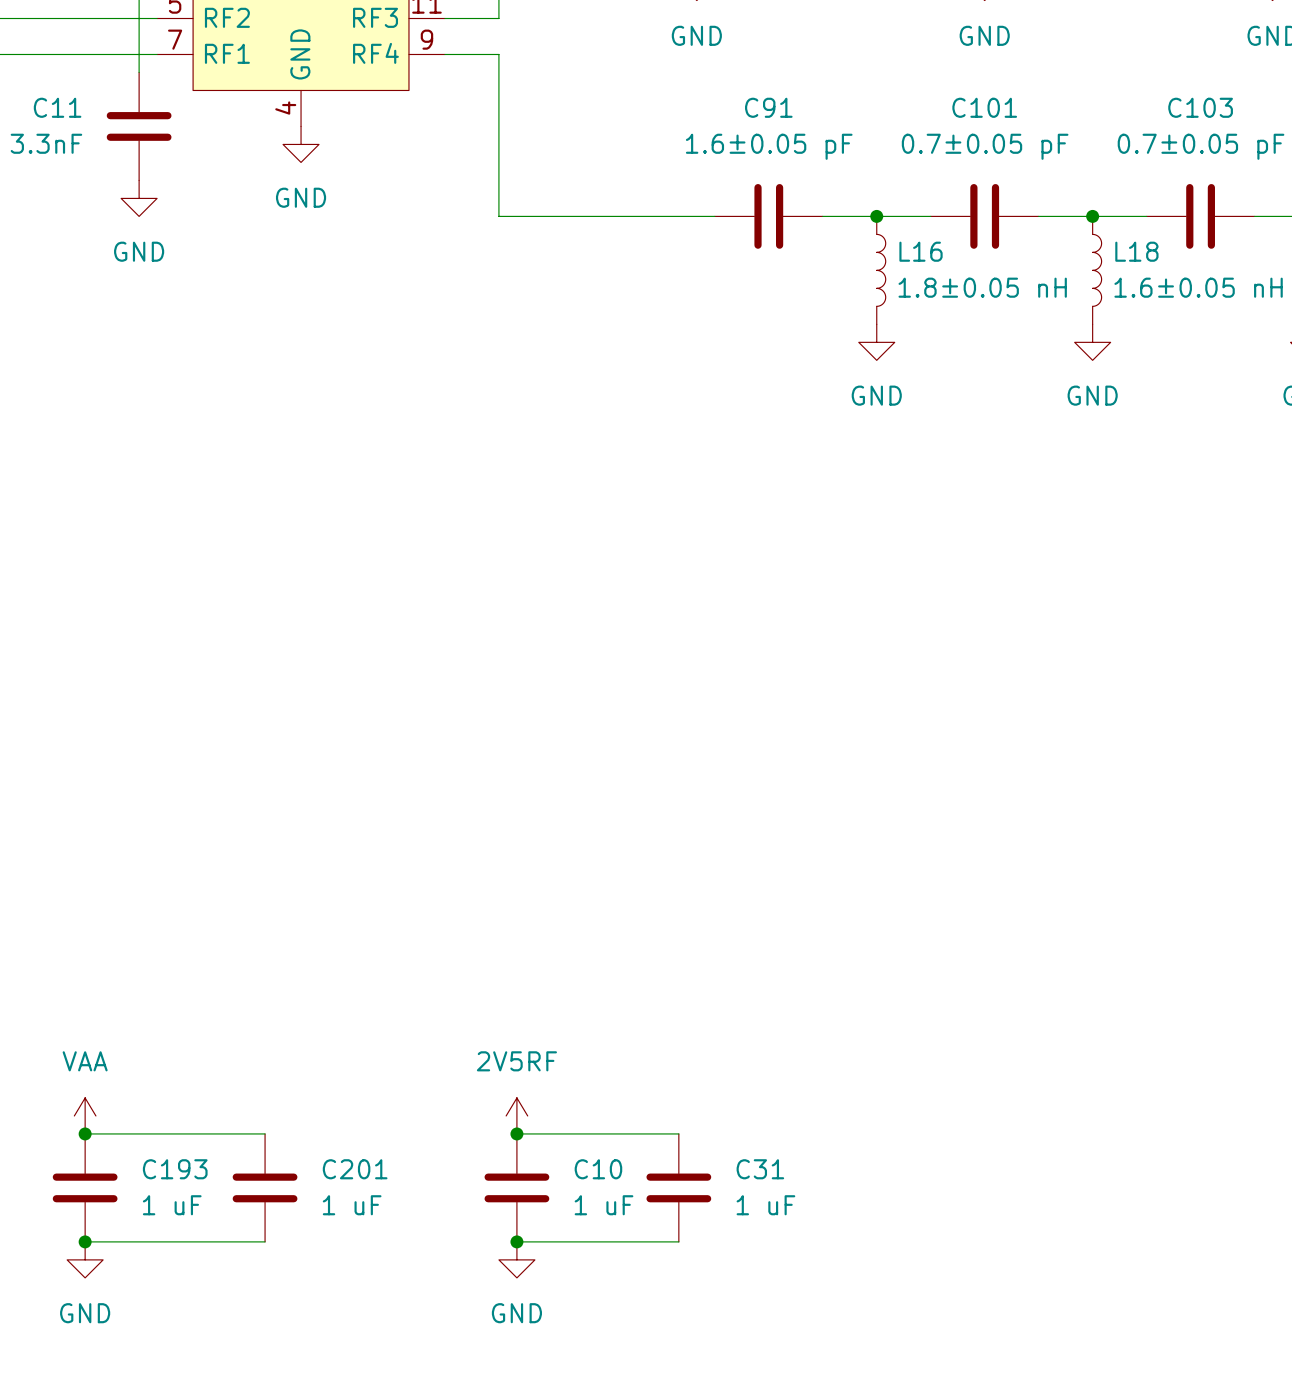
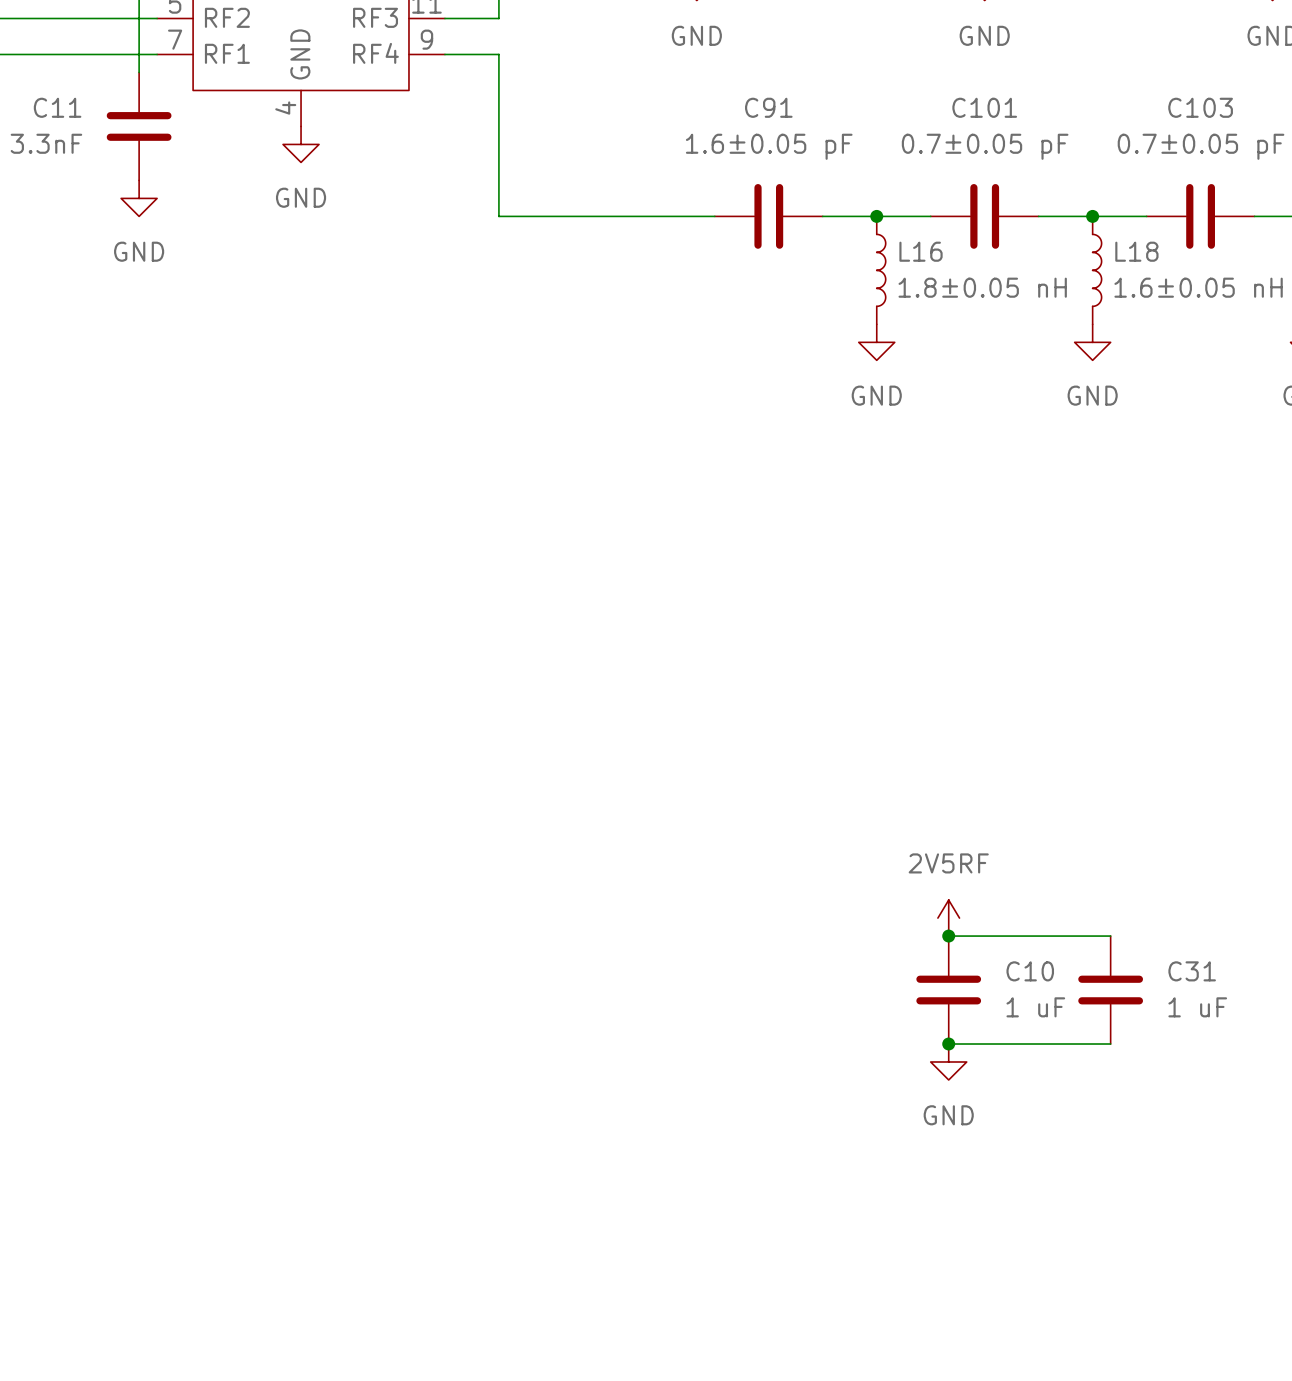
power symbol: none -> 2V5RF (948, 918)
wire: none -> (948, 936) (1110, 936)
junction: none -> (948, 936)
wire: none -> (948, 1044) (1110, 1044)
junction: none -> (948, 1044)
power symbol: none -> GND (948, 1061)
power symbol: VAA (85, 1115) -> none
power symbol: 2V5RF (516, 1115) -> none
wire: (85, 1133) (265, 1133) -> none
junction: (85, 1133) -> none
wire: (516, 1133) (678, 1133) -> none
junction: (516, 1133) -> none
C193: 1 uF (85, 1187) -> none
C201: 1 uF (265, 1187) -> none
C10 position: (516, 1187) -> (948, 990)
C31 position: (678, 1187) -> (1110, 990)
wire: (85, 1241) (265, 1241) -> none
junction: (85, 1241) -> none
wire: (516, 1241) (678, 1241) -> none
junction: (516, 1241) -> none
power symbol: GND (85, 1259) -> none
power symbol: GND (516, 1259) -> none

